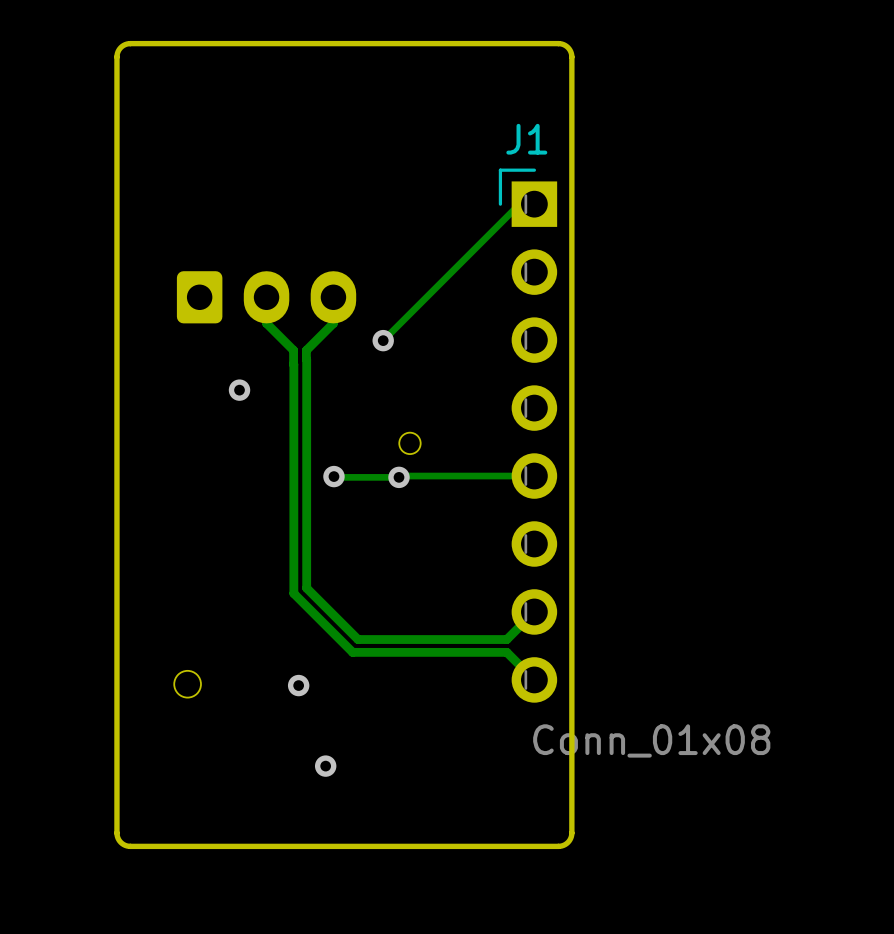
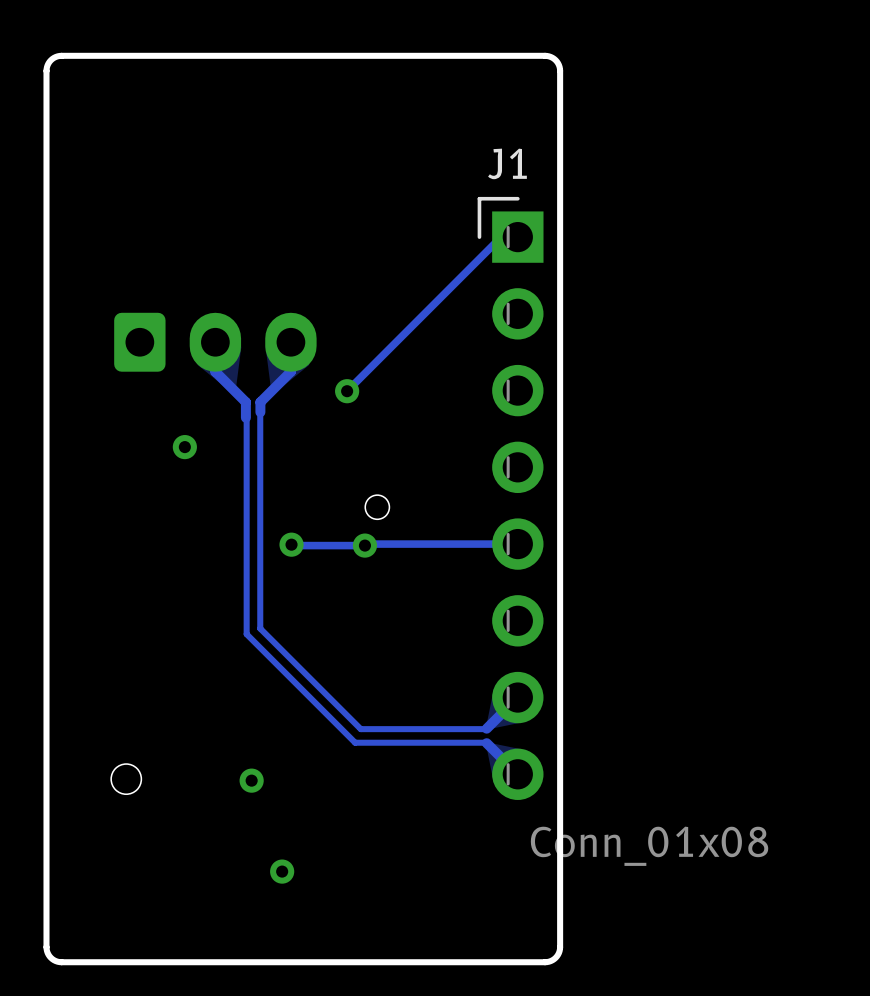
track: (306, 359) (306, 588) (358, 639) (506, 639) -> (291, 342) (291, 372) (260, 403) (260, 628) (360, 729) (486, 728)
track: (293, 364) (293, 593) (352, 652) (506, 652) -> (215, 342) (215, 372) (246, 403) (246, 634) (355, 742) (486, 743)

